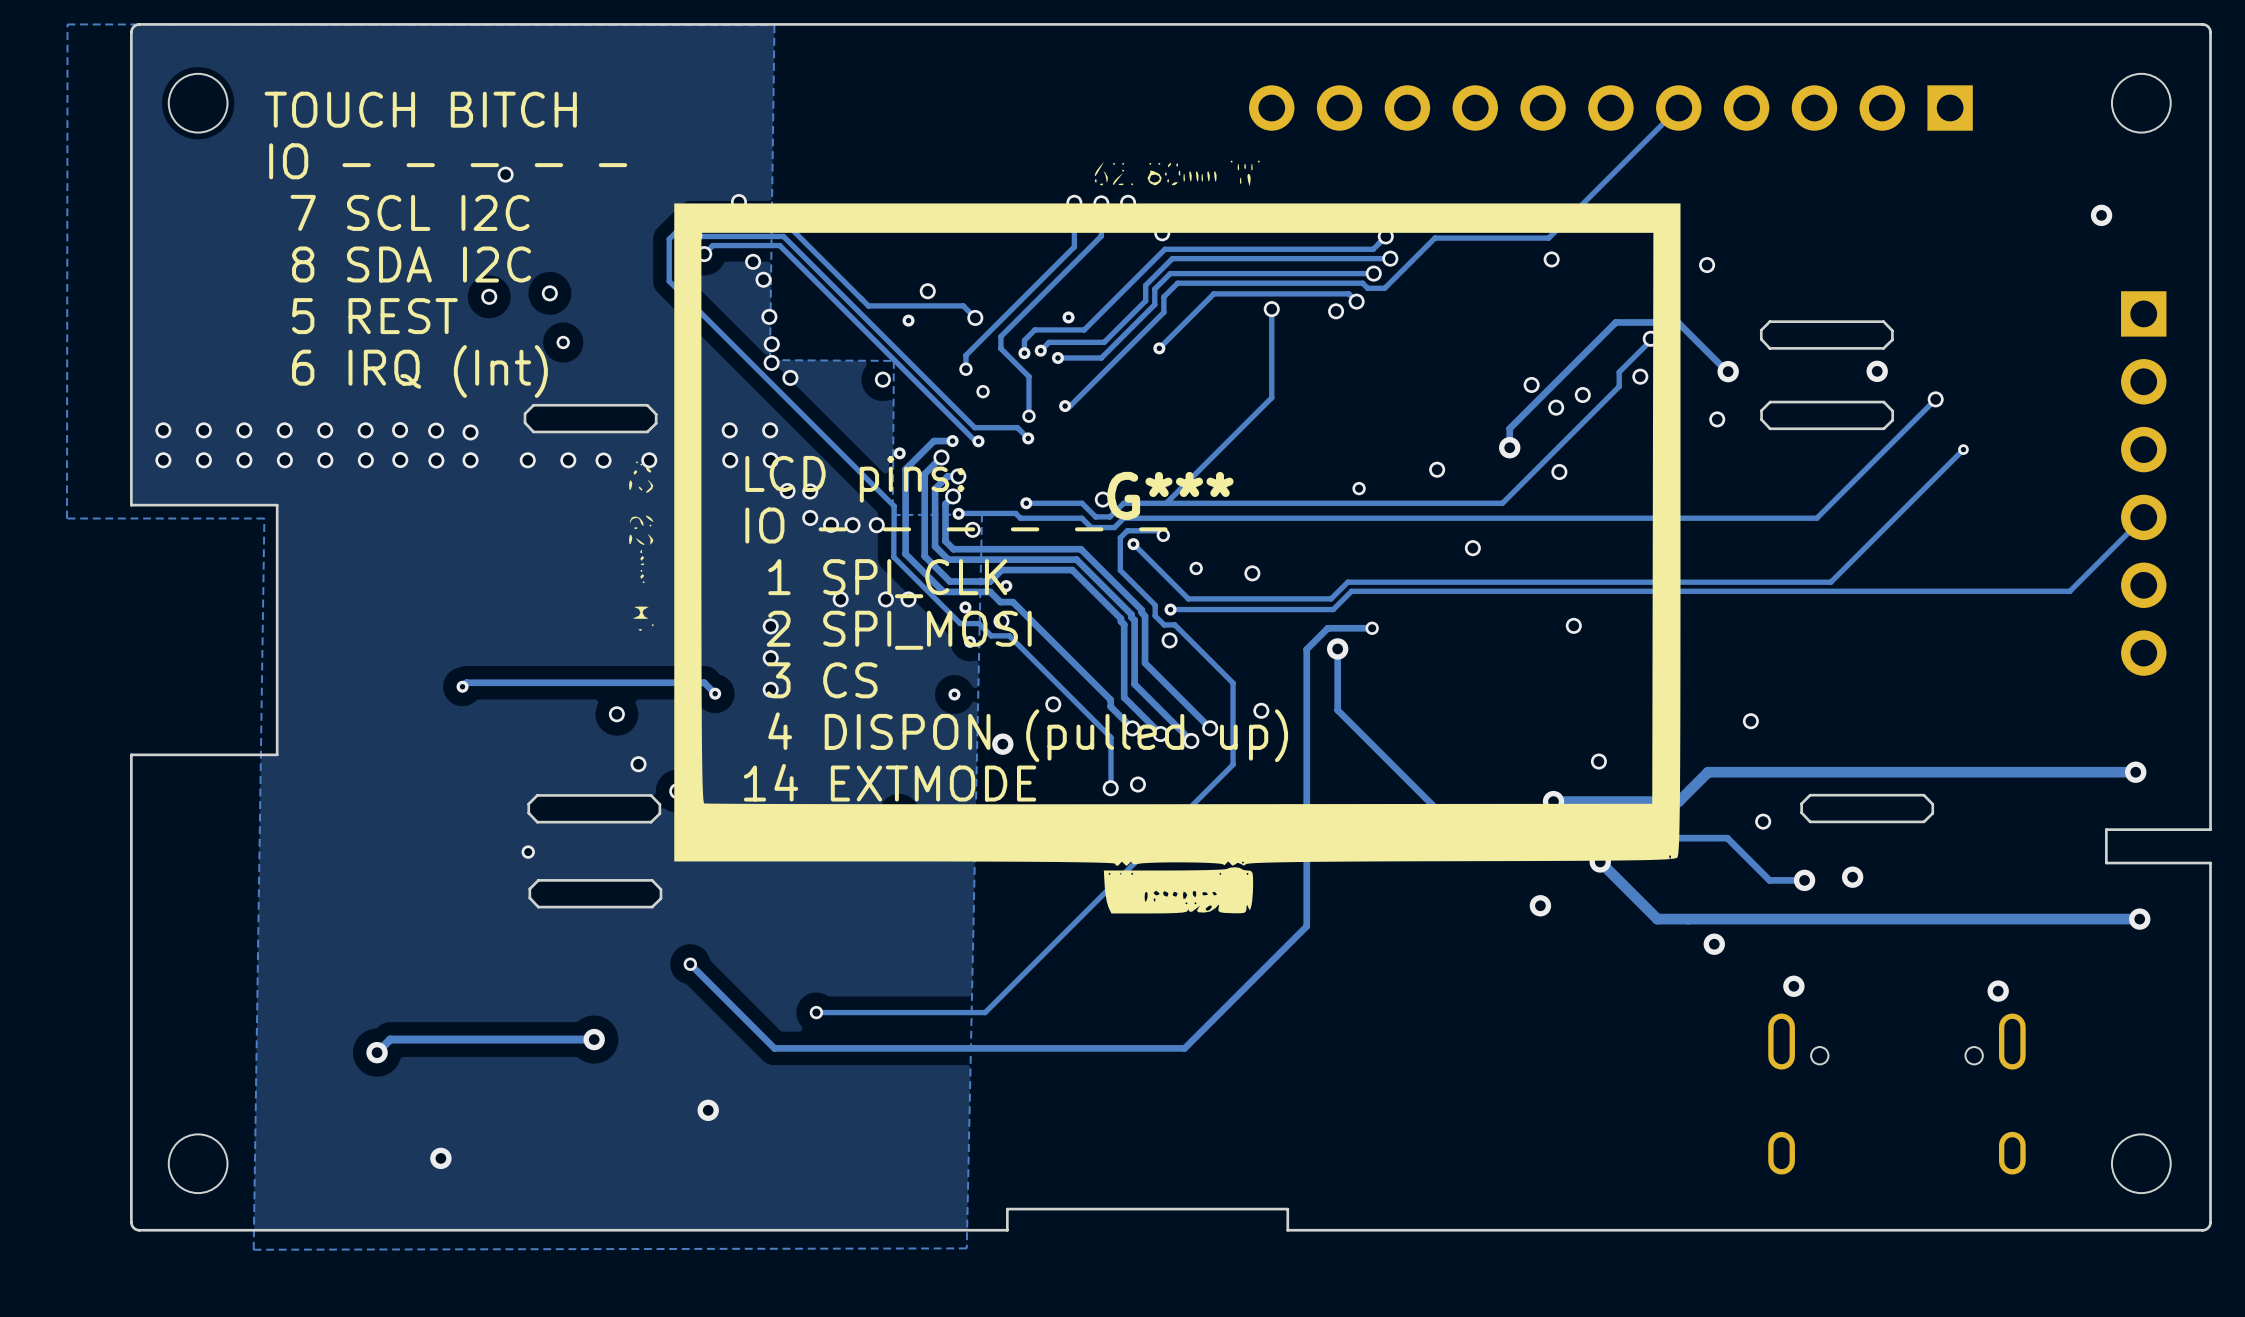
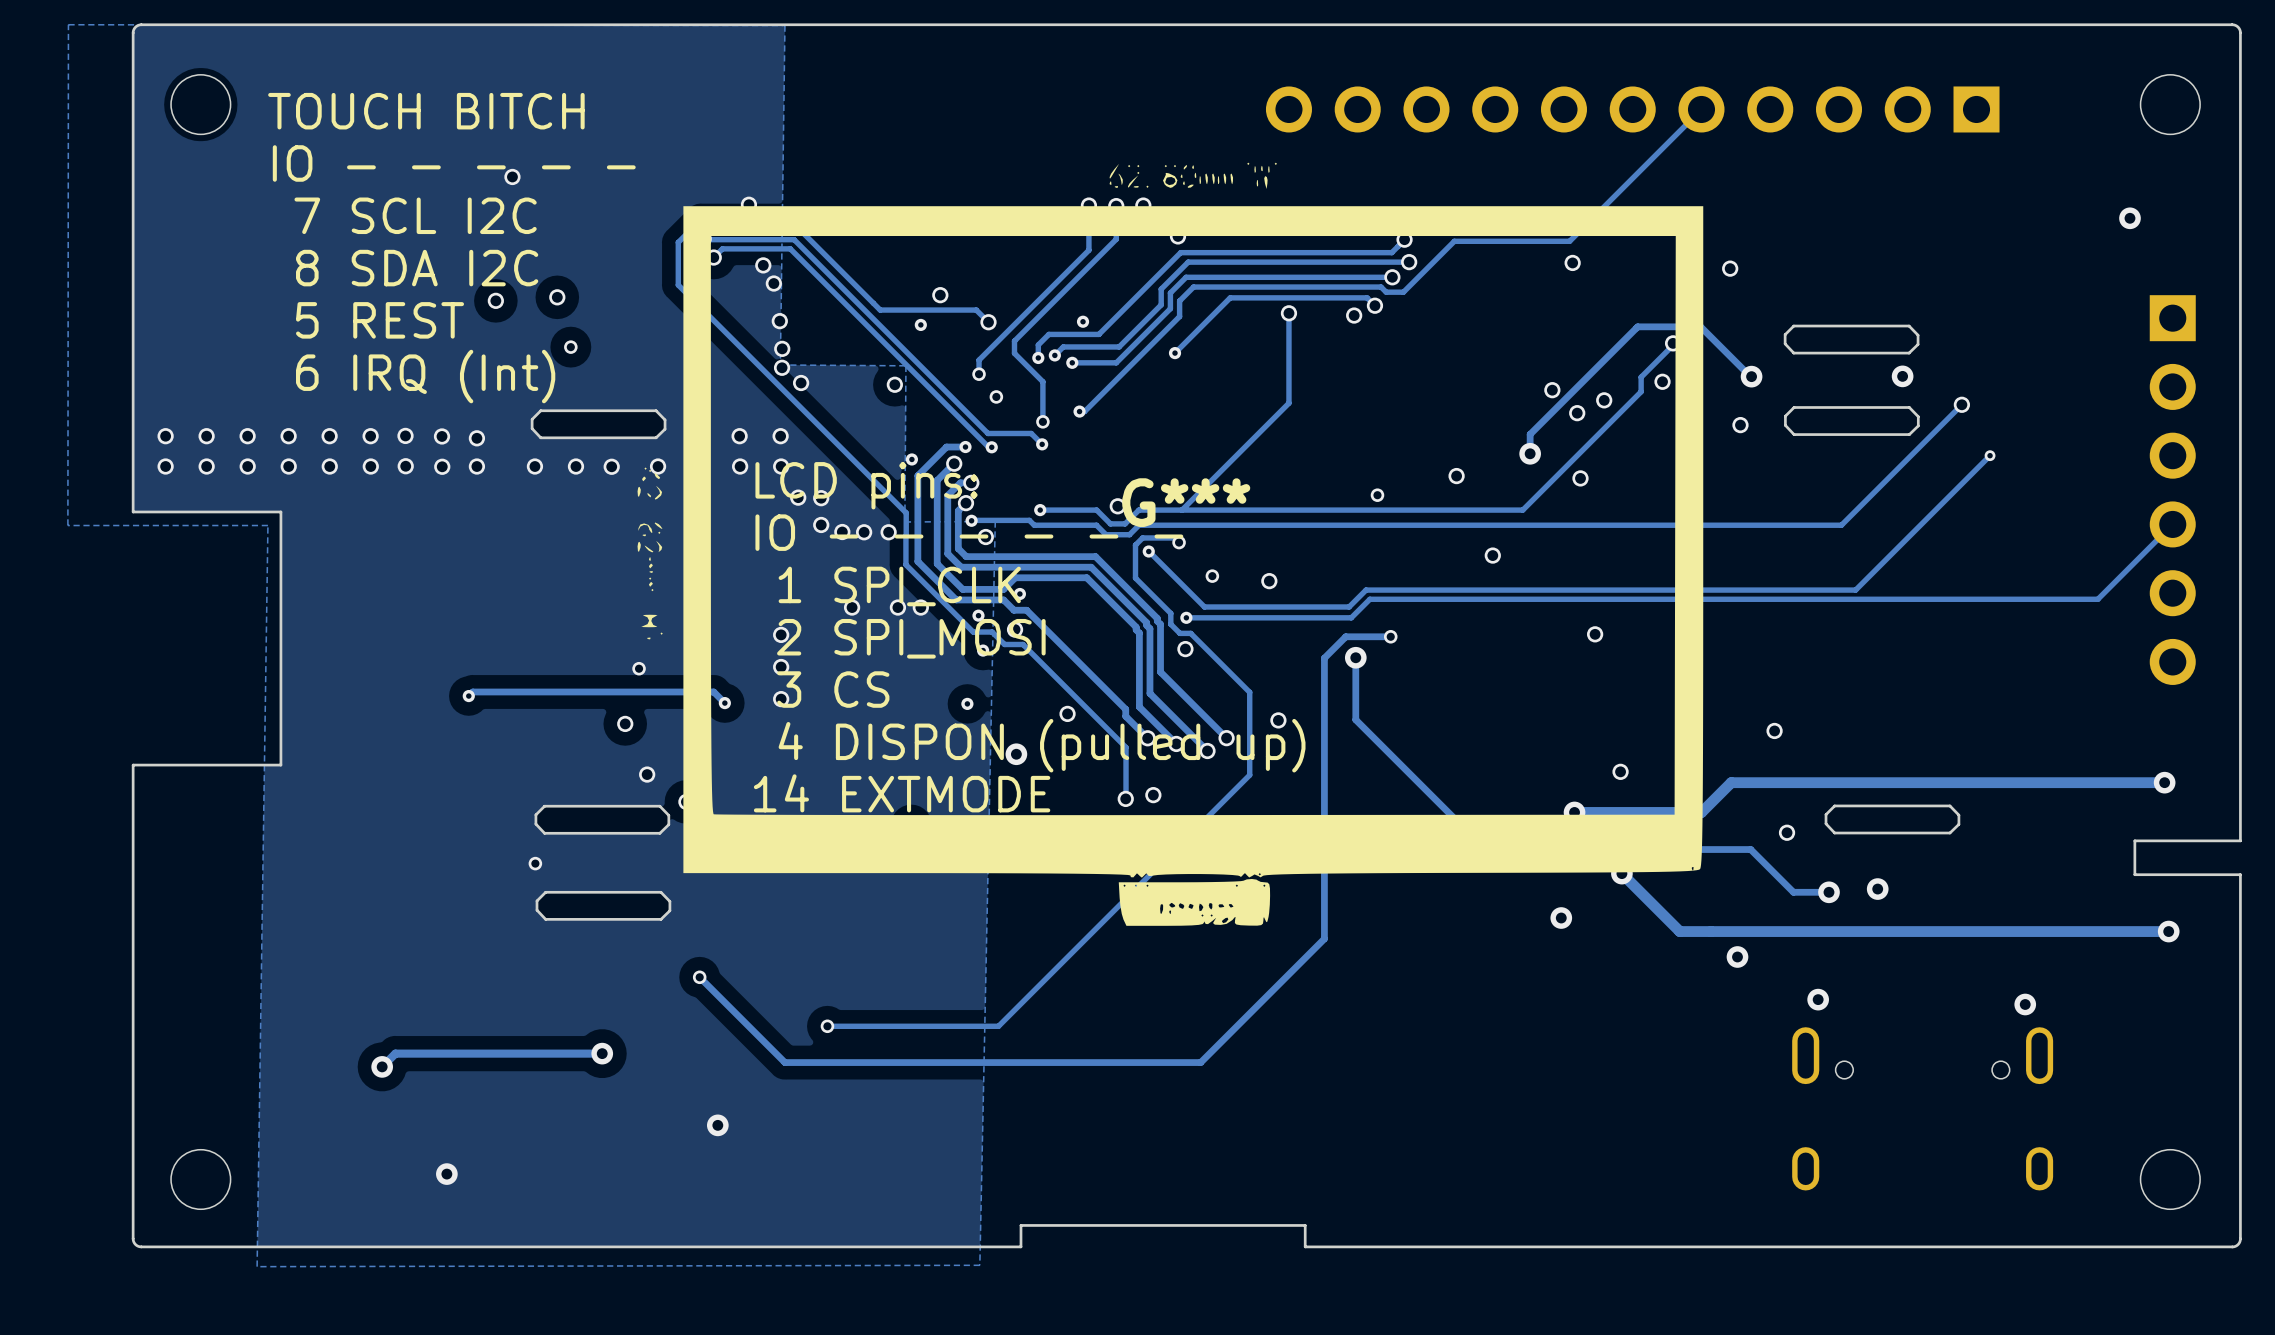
via: none -> (639, 668)

